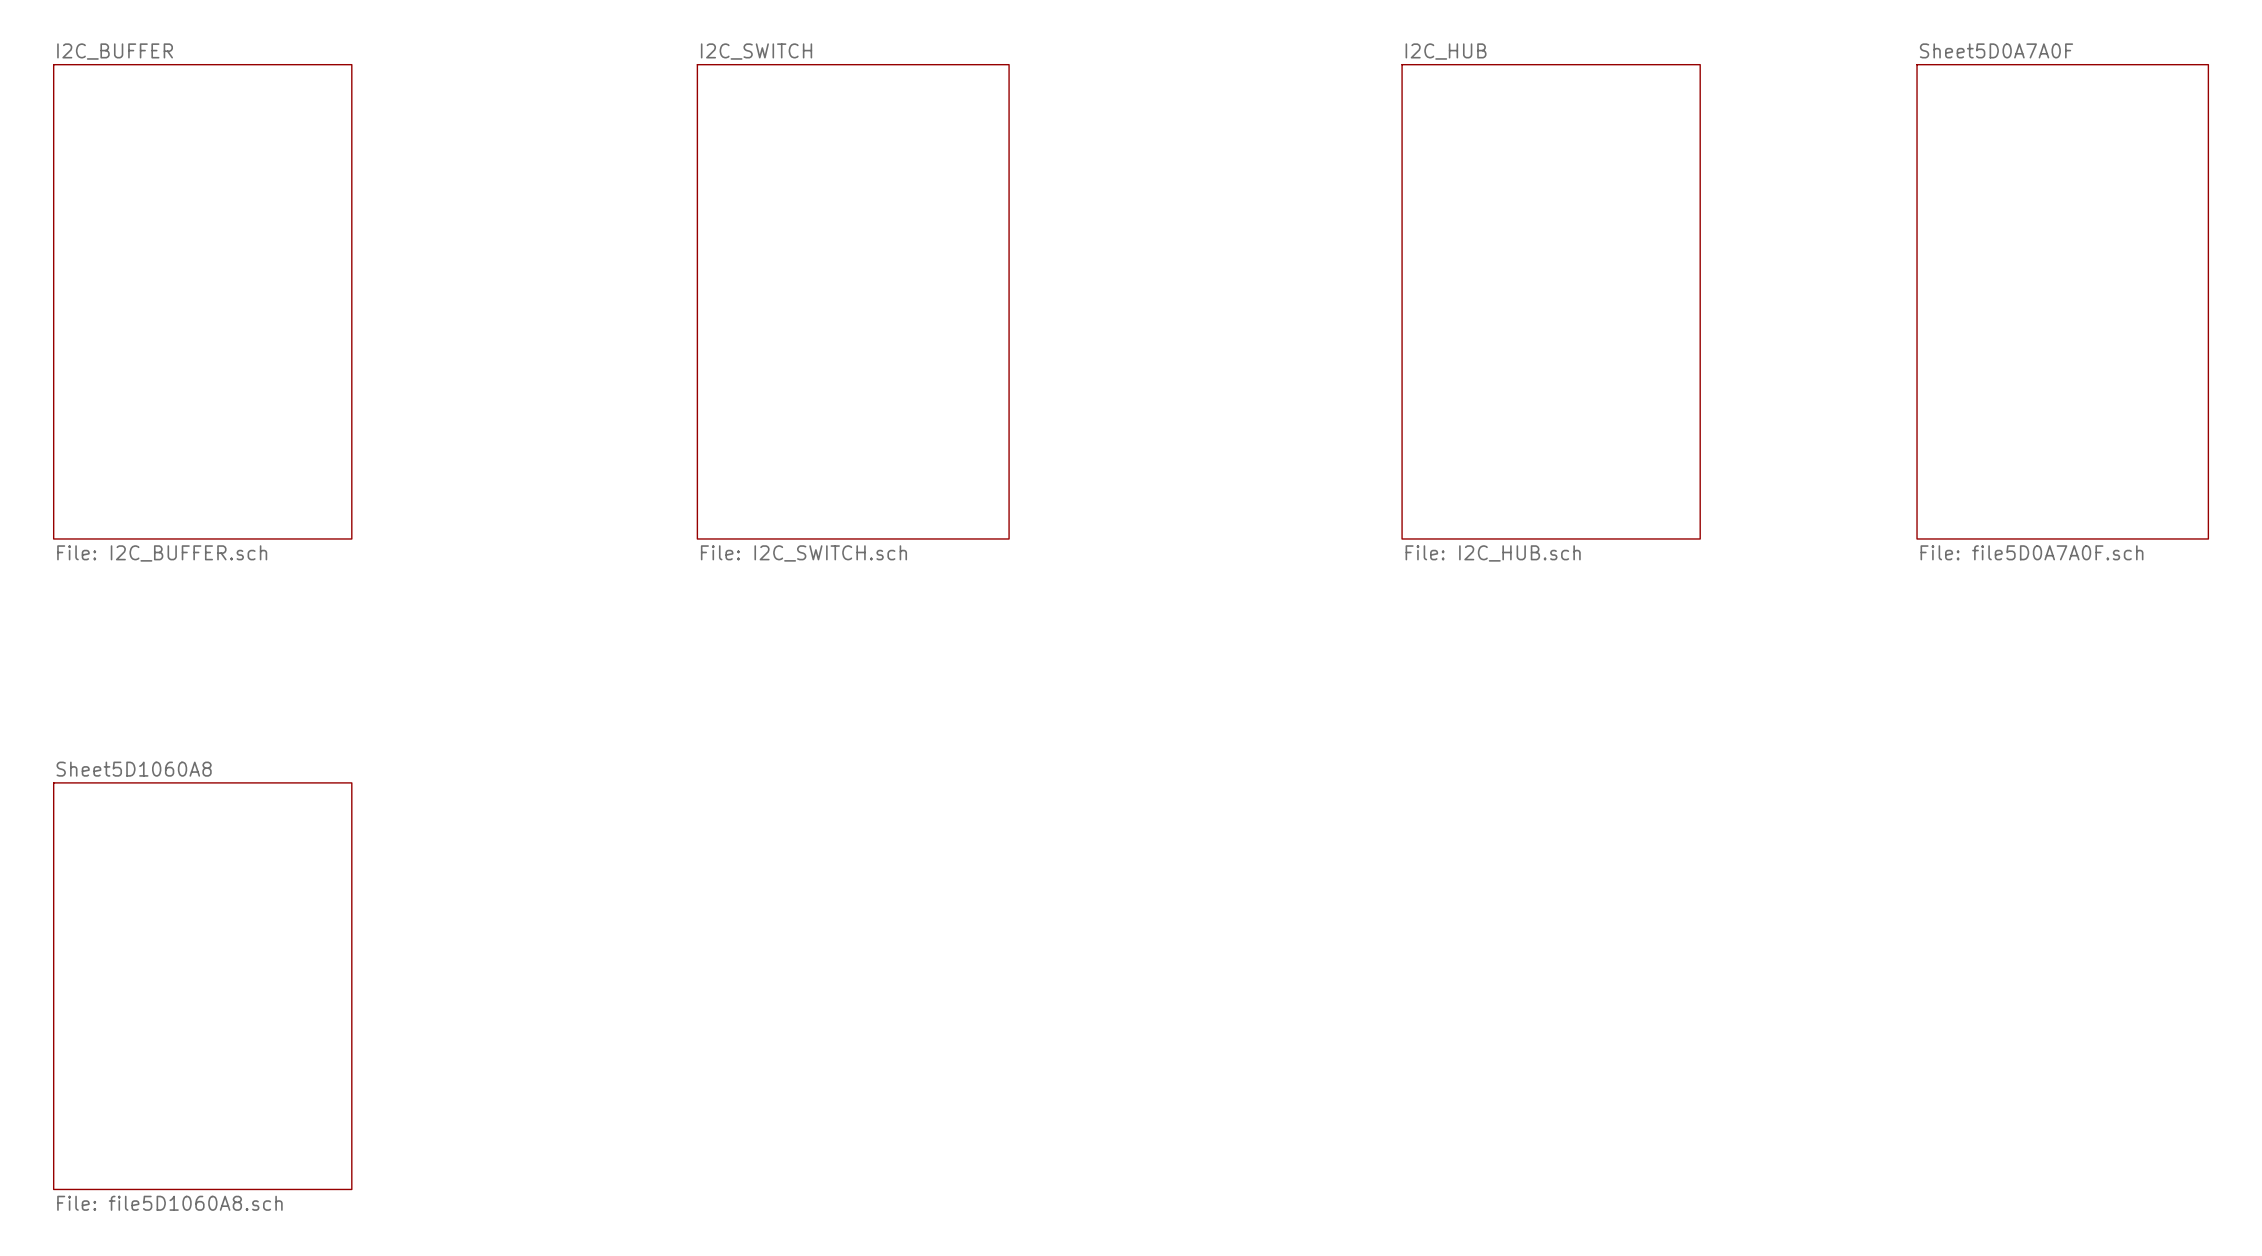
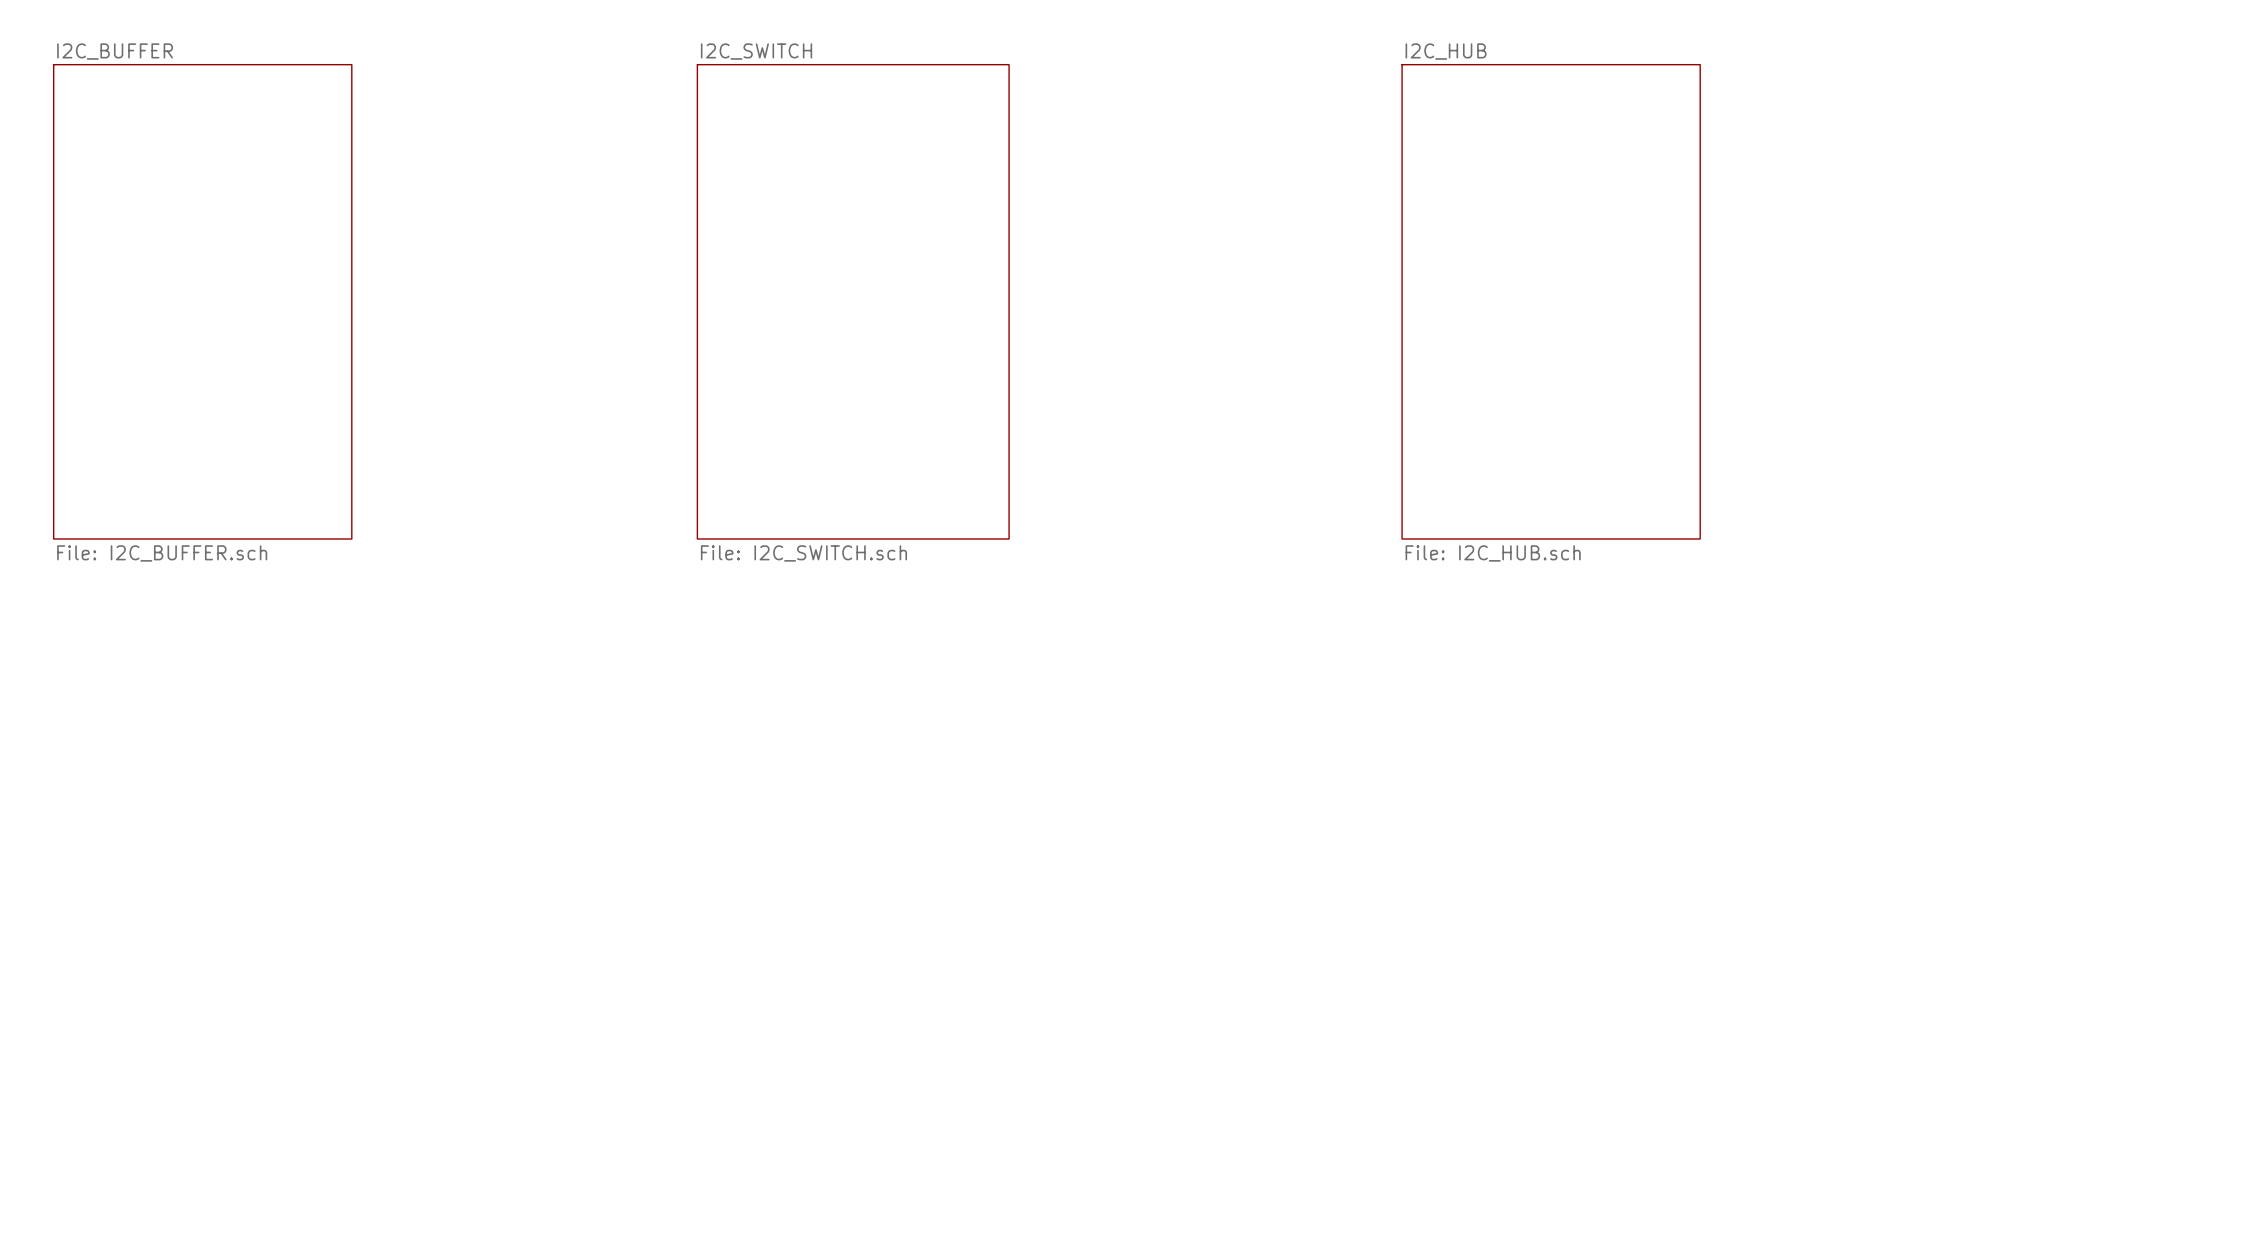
sheet Sheet5D0A7A0F: File: file5D0A7A0F.sch (2062, 301) -> none
sheet Sheet5D1060A8: File: file5D1060A8.sch (202, 986) -> none

